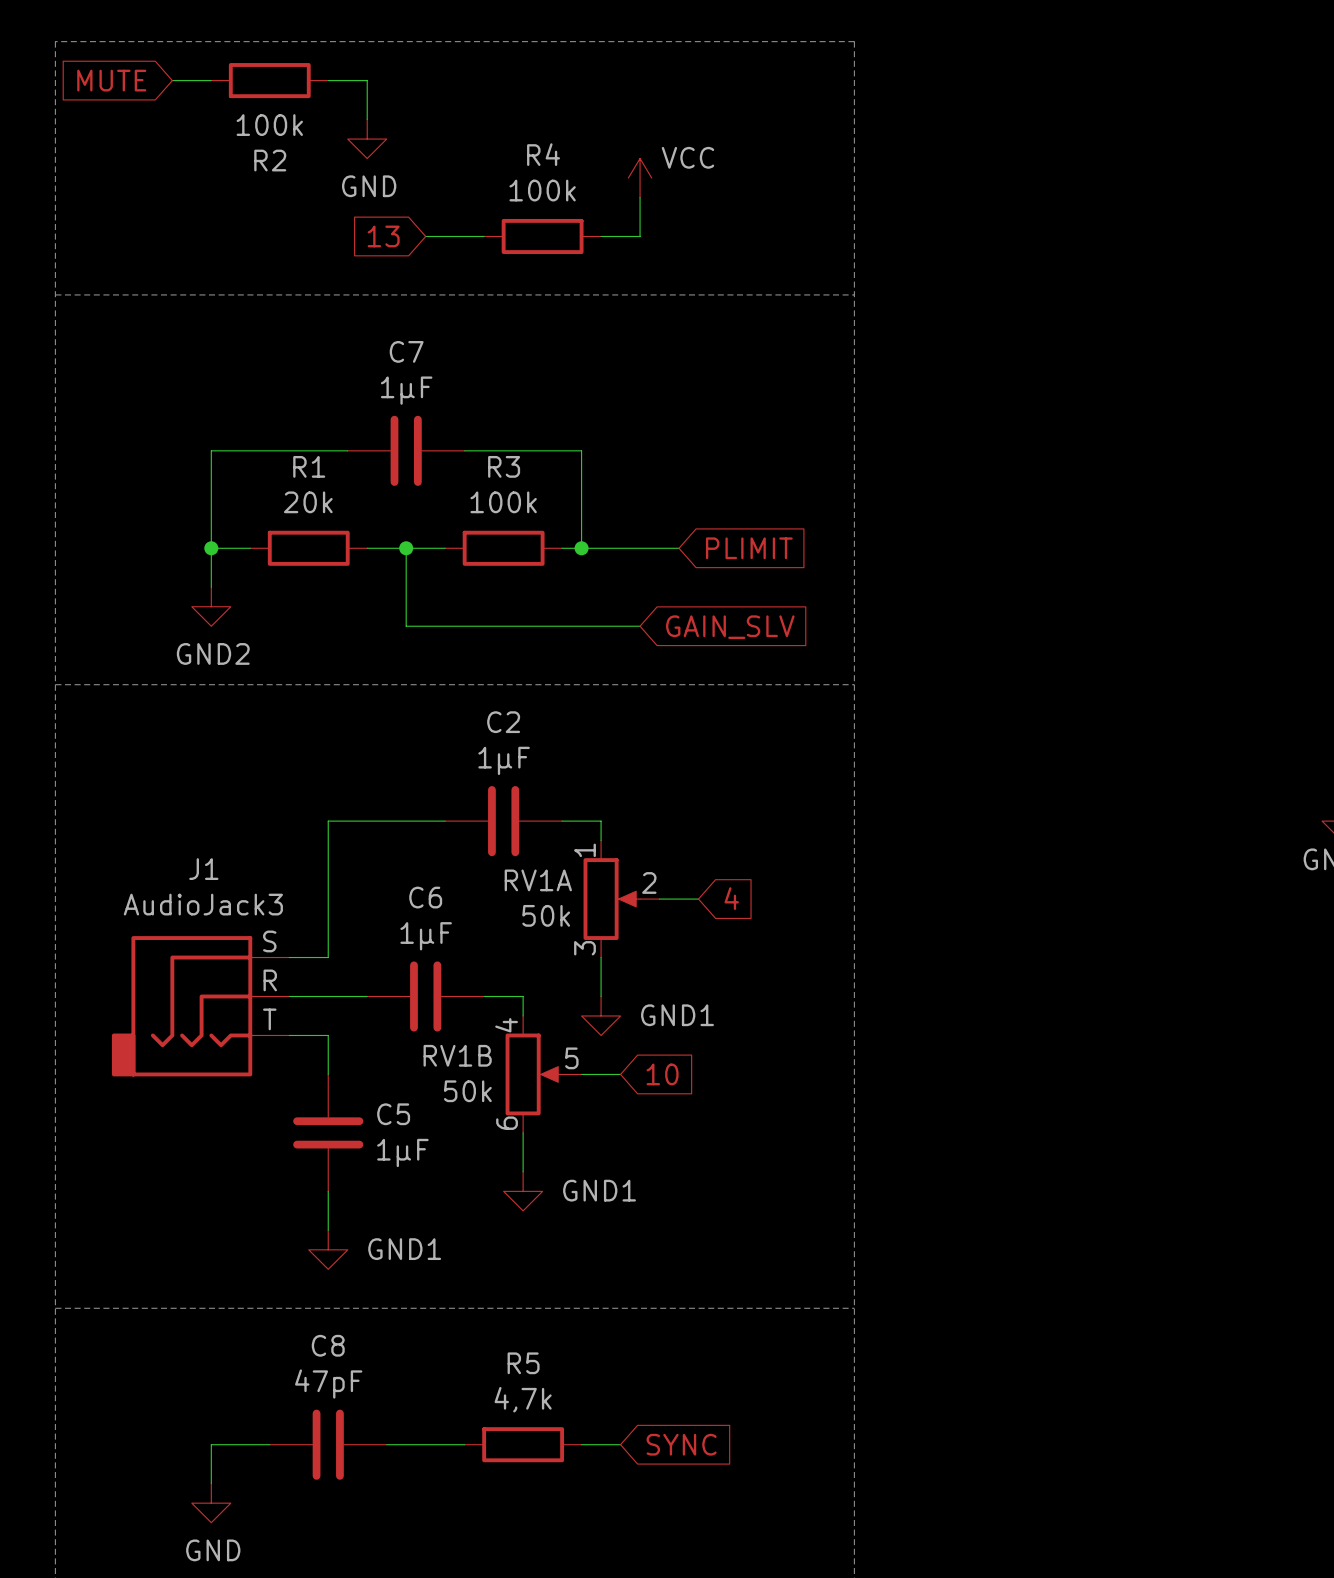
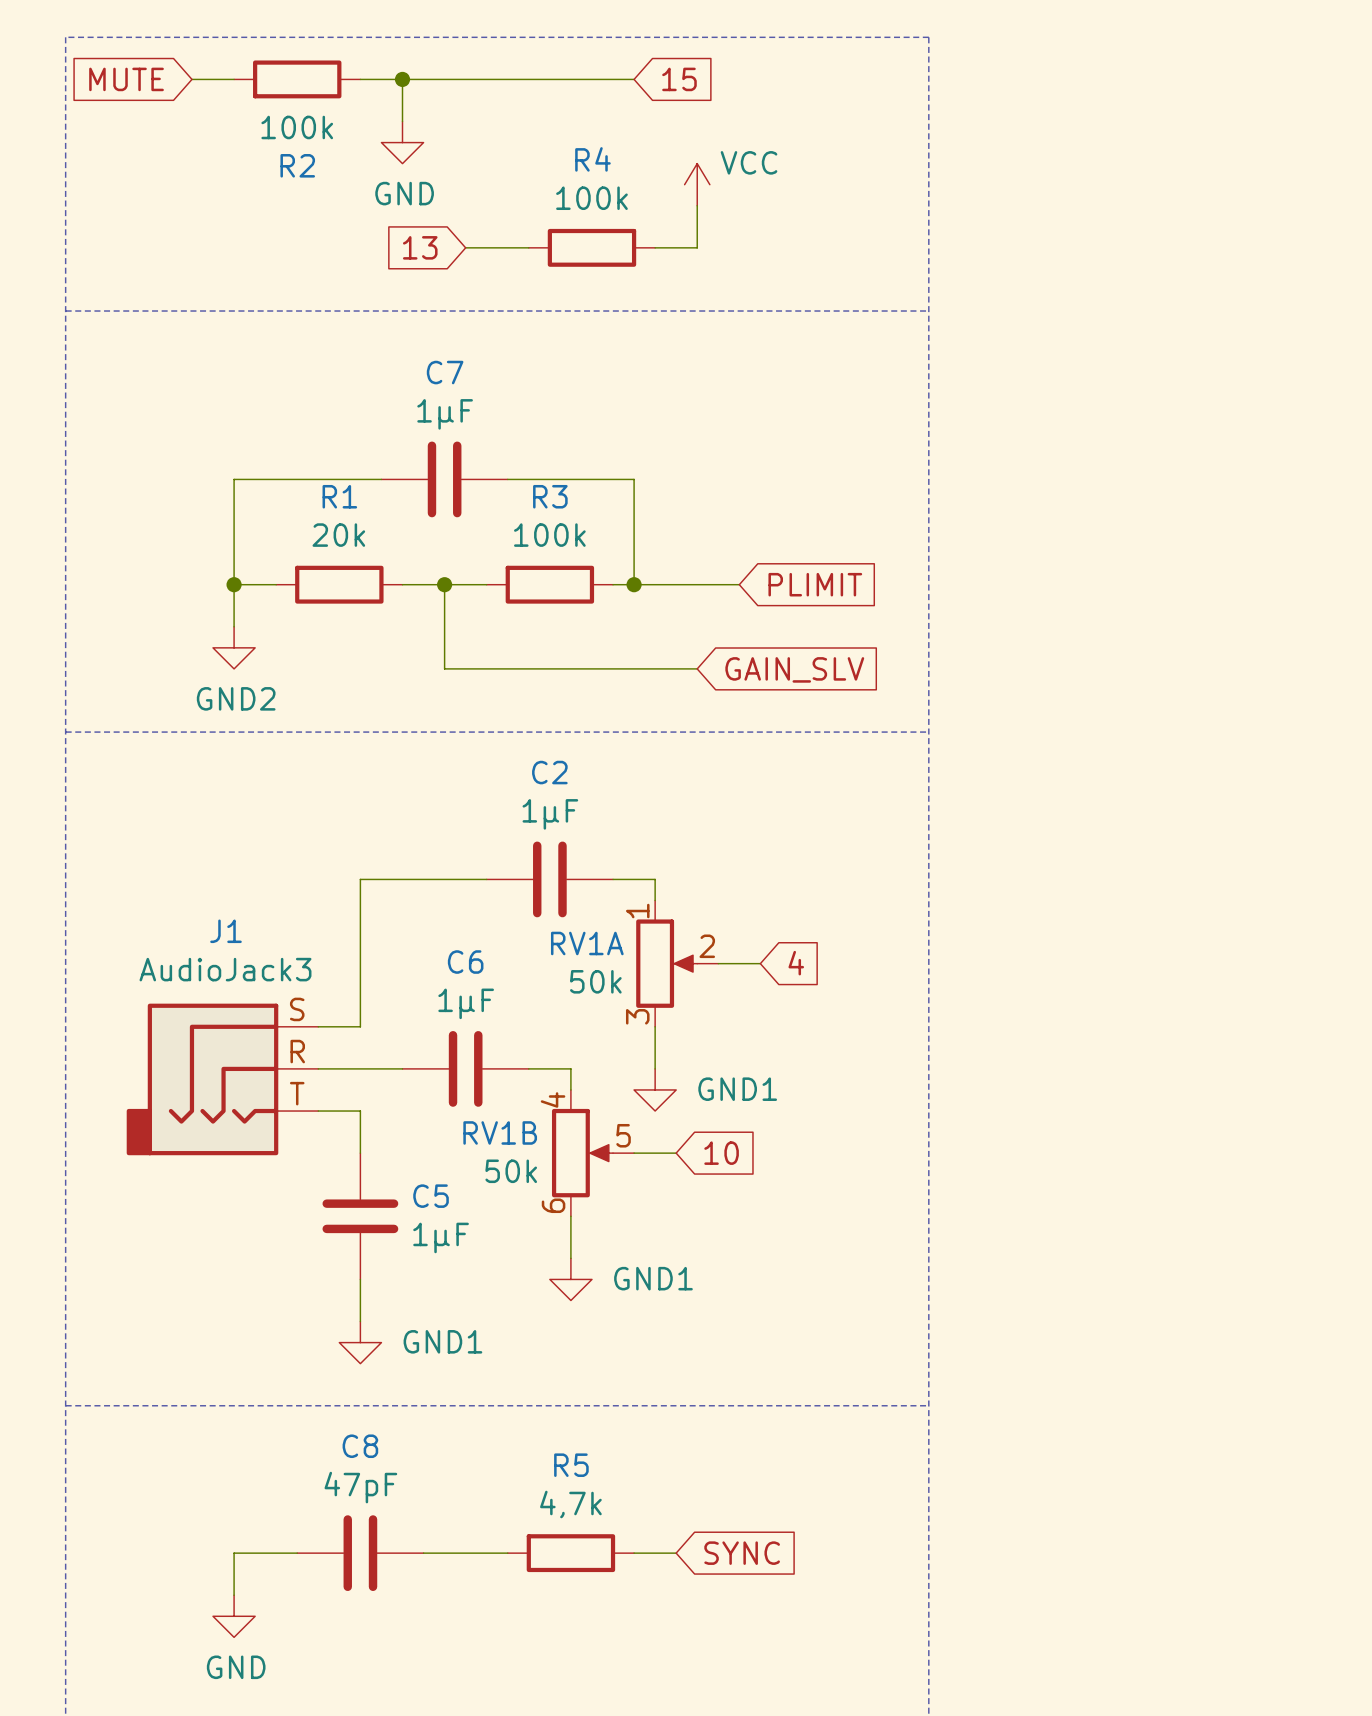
wire: none -> (402, 79) (634, 79)
junction: none -> (402, 79)
global label: none -> 15 (679, 79)

